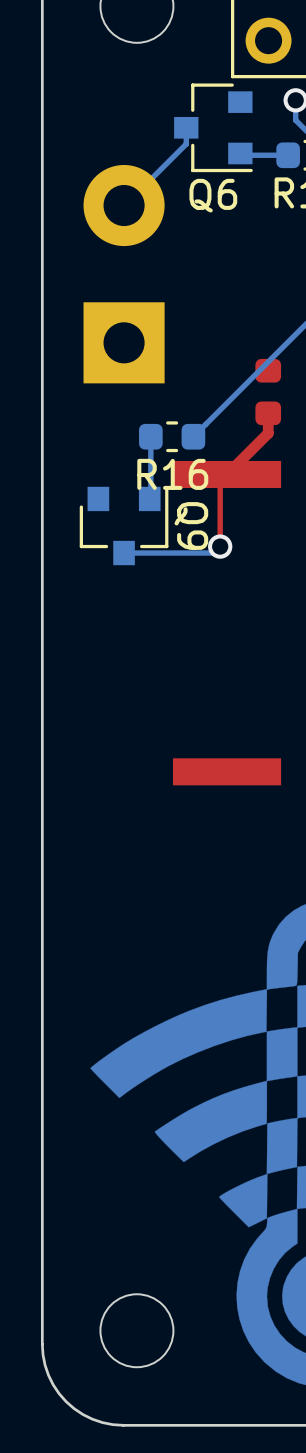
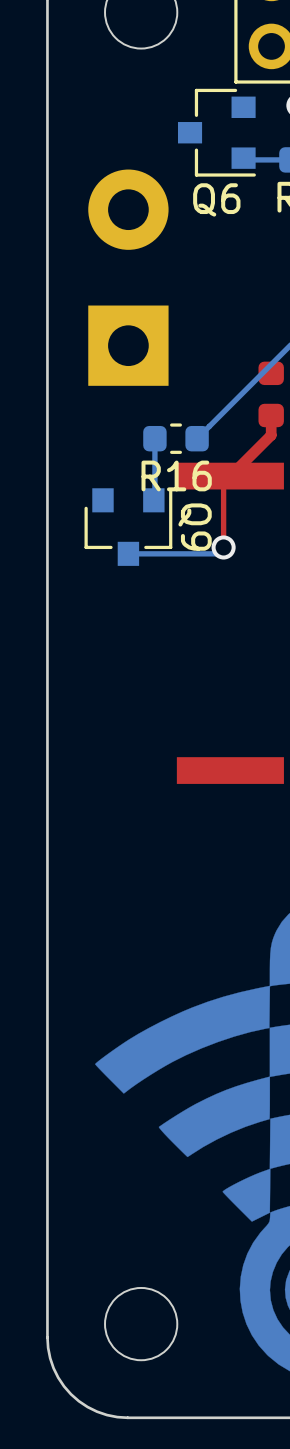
bottom track: (186, 127) (186, 144) (124, 205) -> none

